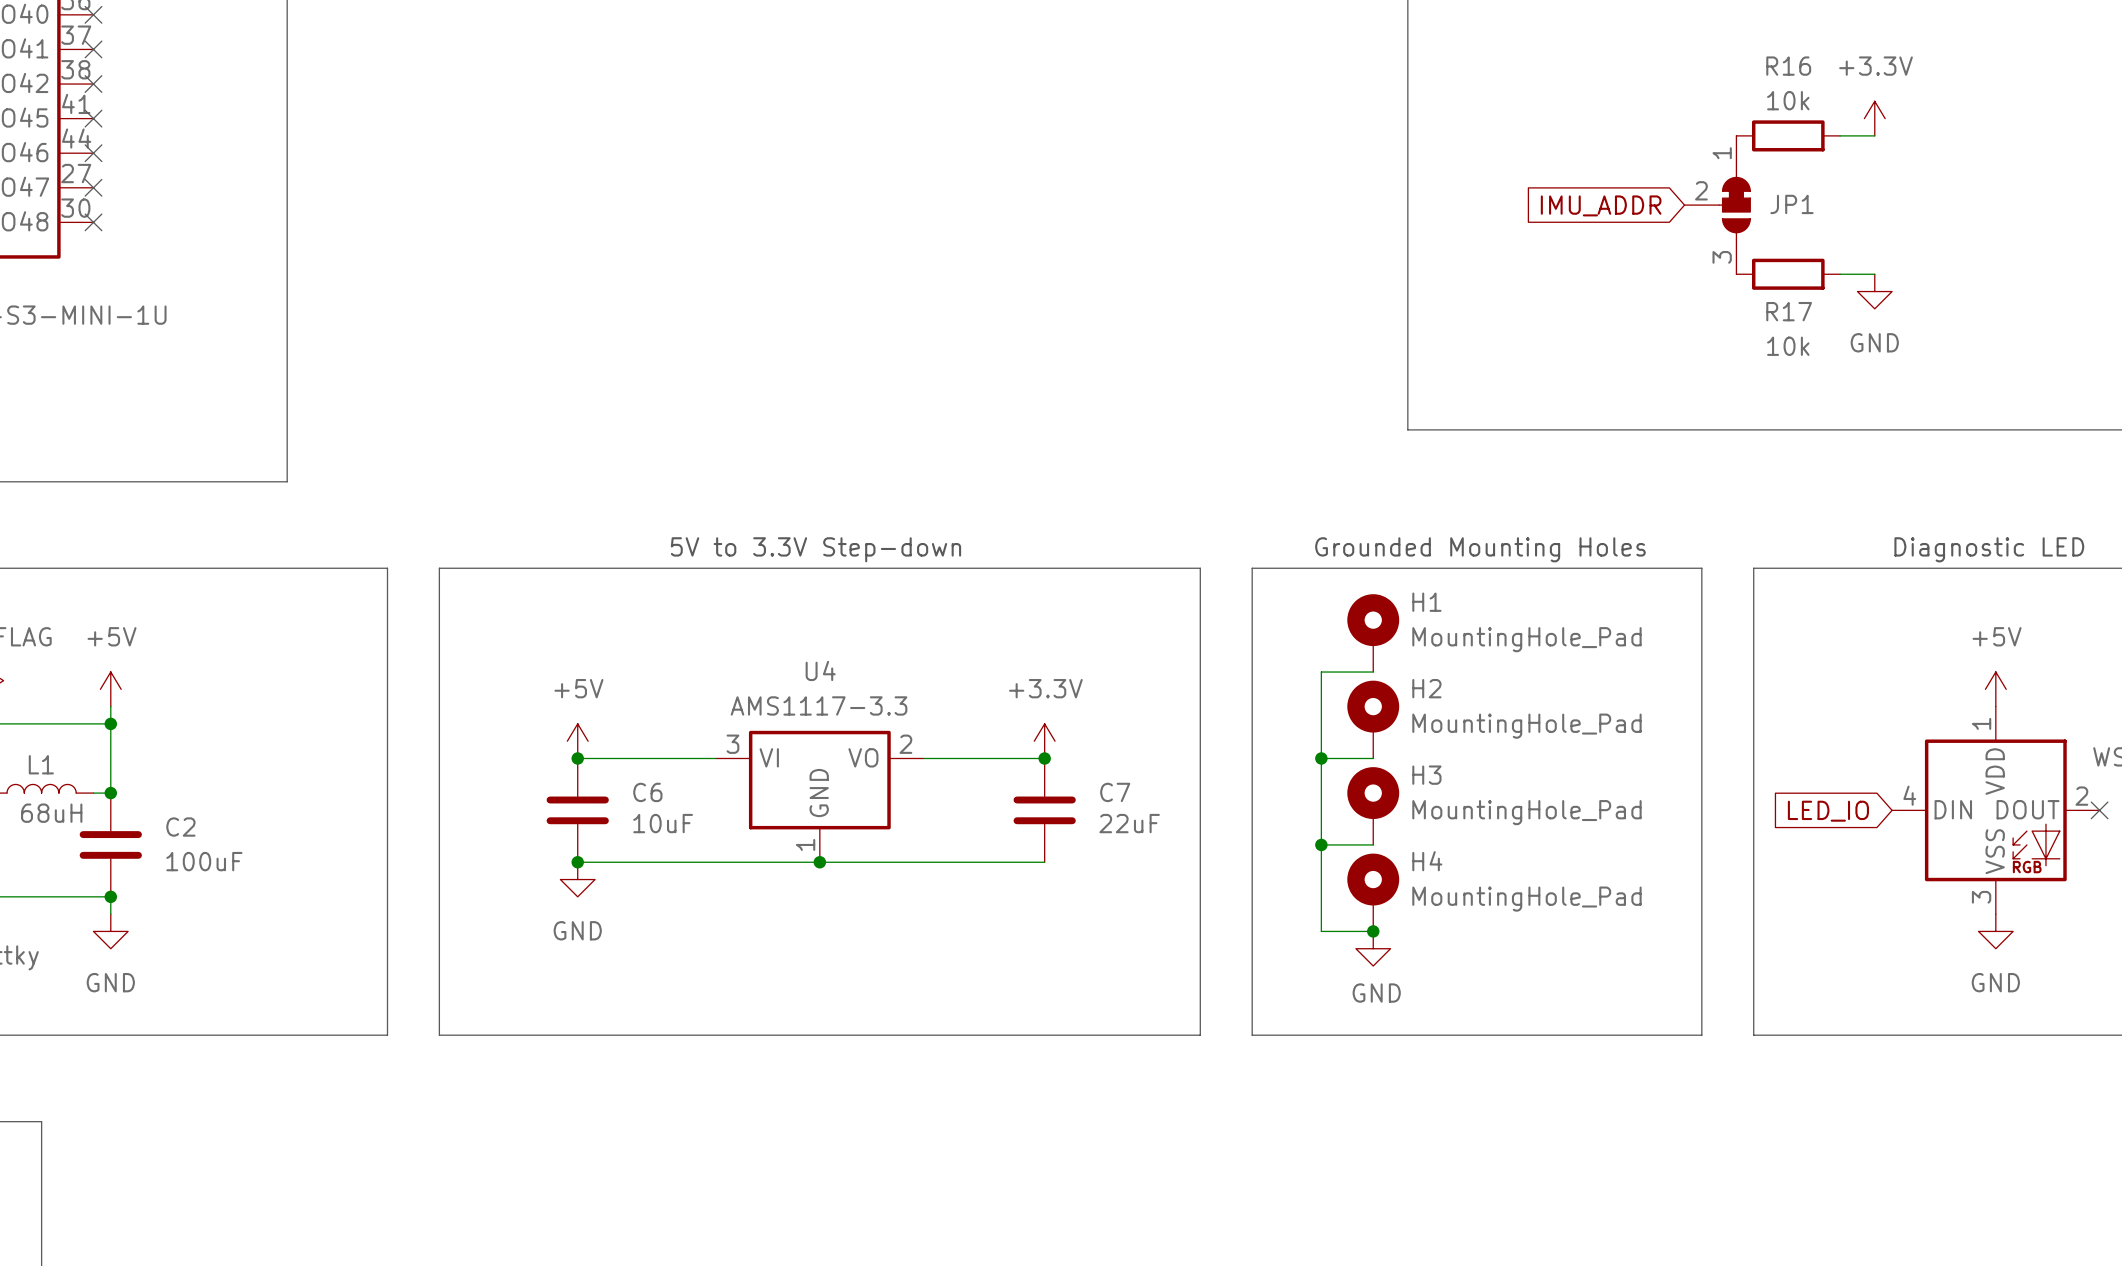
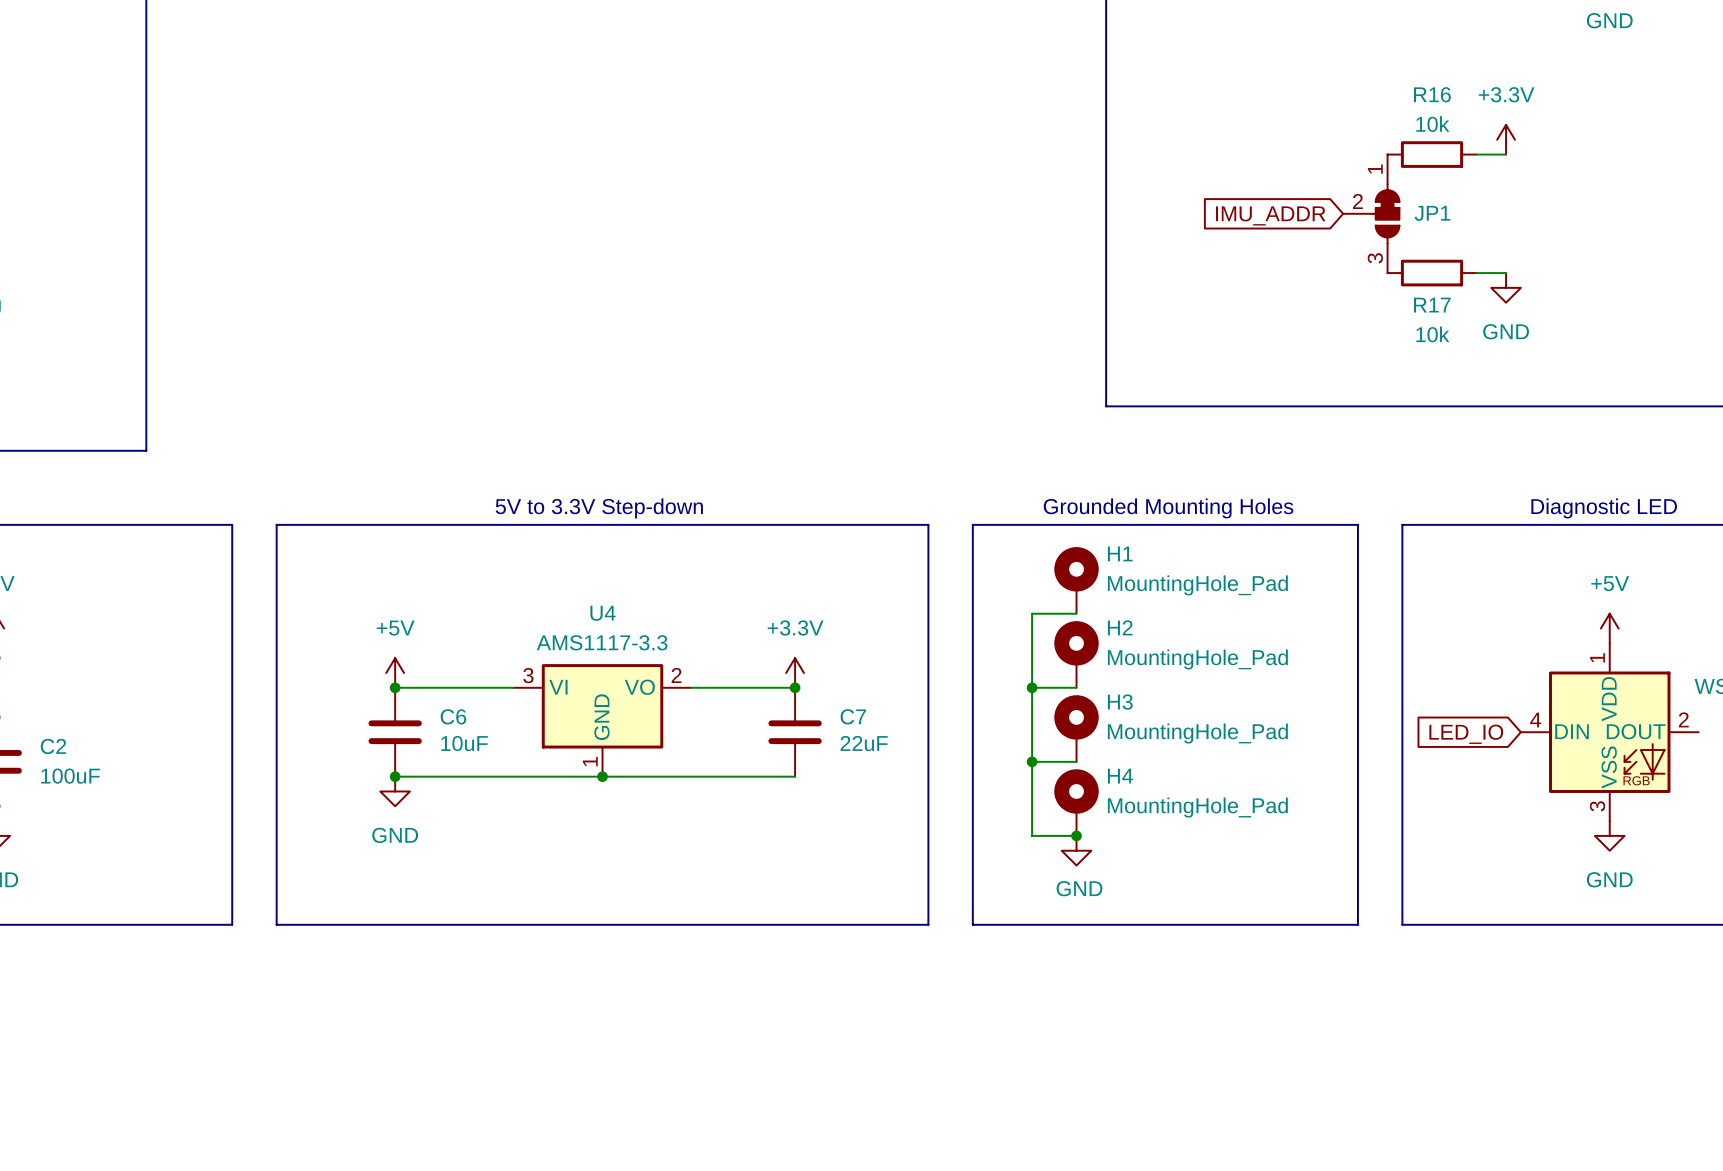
no-connect mark: (2099, 810) -> none

